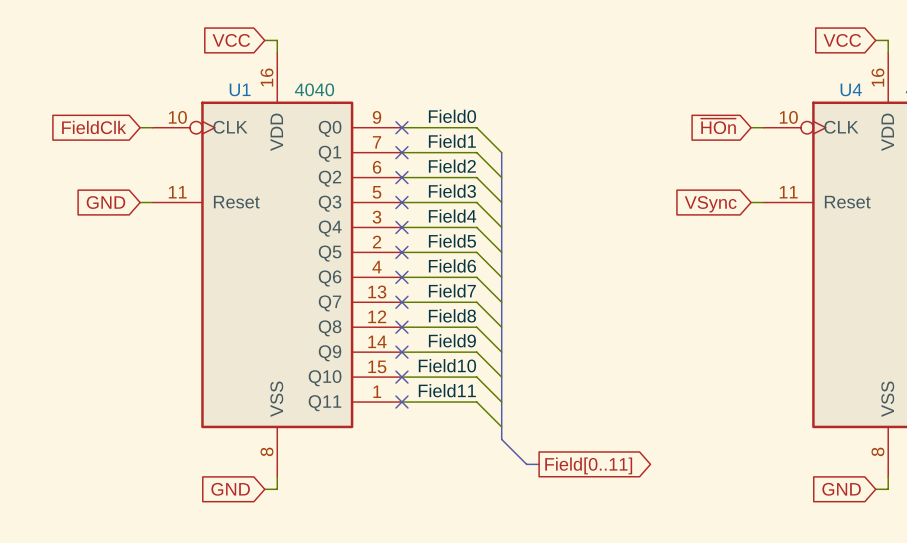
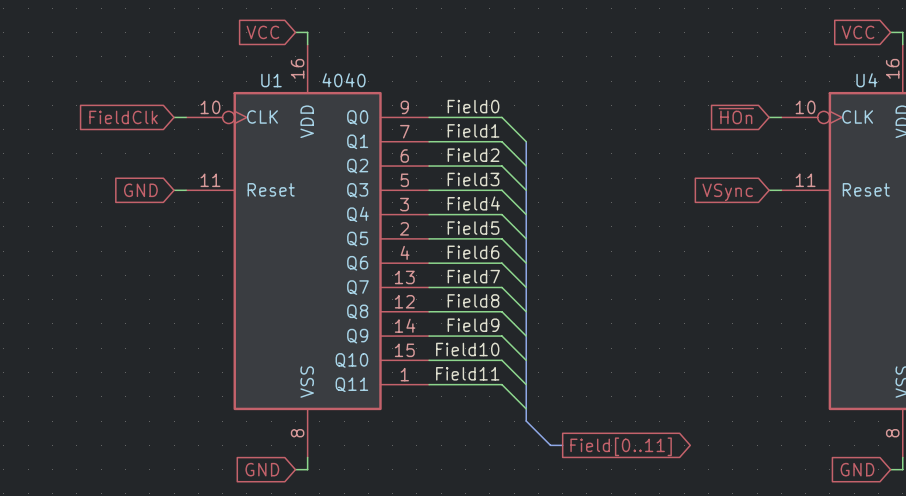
no-connect mark: (401, 127) -> none
no-connect mark: (401, 152) -> none
no-connect mark: (401, 177) -> none
no-connect mark: (401, 202) -> none
no-connect mark: (401, 227) -> none
no-connect mark: (401, 252) -> none
no-connect mark: (401, 277) -> none
no-connect mark: (401, 302) -> none
no-connect mark: (401, 327) -> none
no-connect mark: (401, 352) -> none
no-connect mark: (401, 377) -> none
no-connect mark: (401, 402) -> none

